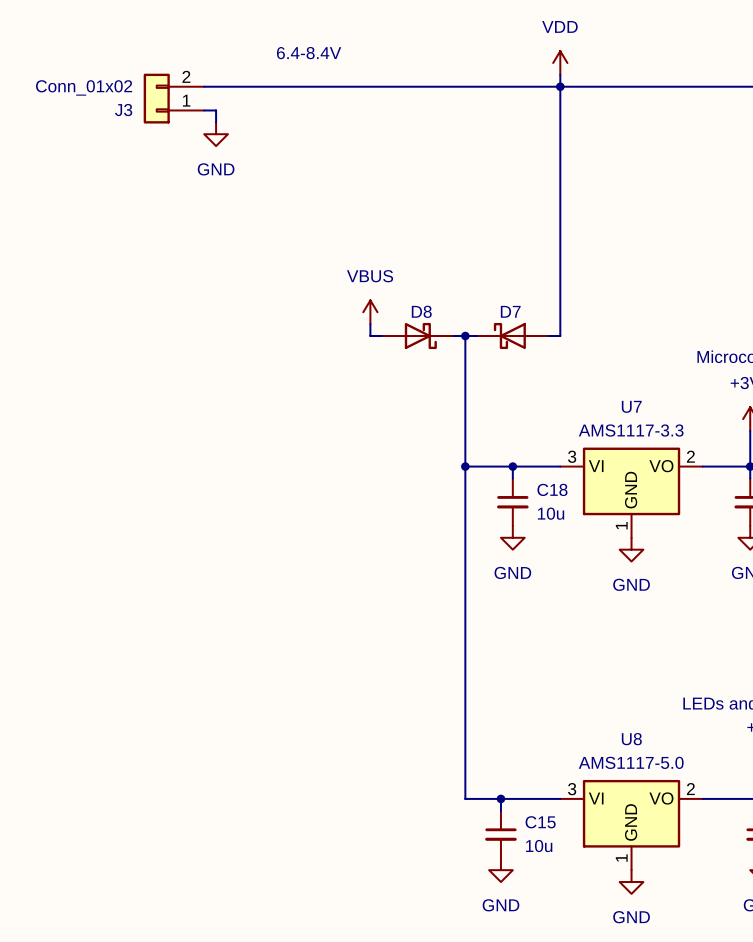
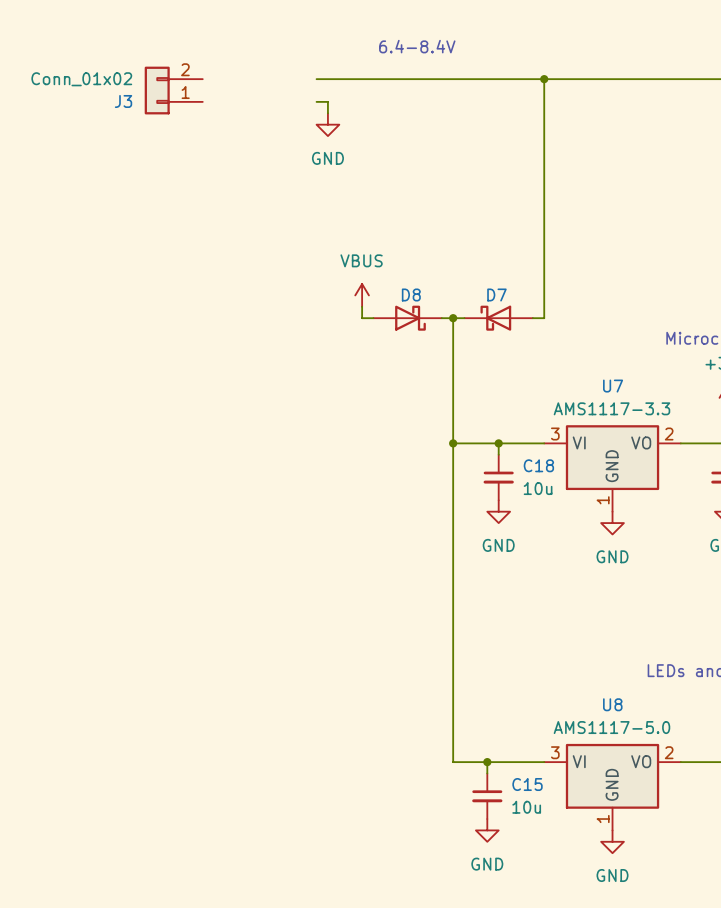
text position: 6.4-8.4V (309, 53) -> 6.4-8.4V (417, 46)
power symbol: VDD (560, 62) -> none
wire: (560, 74) (560, 86) -> none
wire: (204, 86) (322, 86) -> none
wire: (204, 110) (216, 110) (216, 122) -> (316, 101) (327, 101) (327, 113)
power symbol position: GND (216, 134) -> GND (327, 124)

